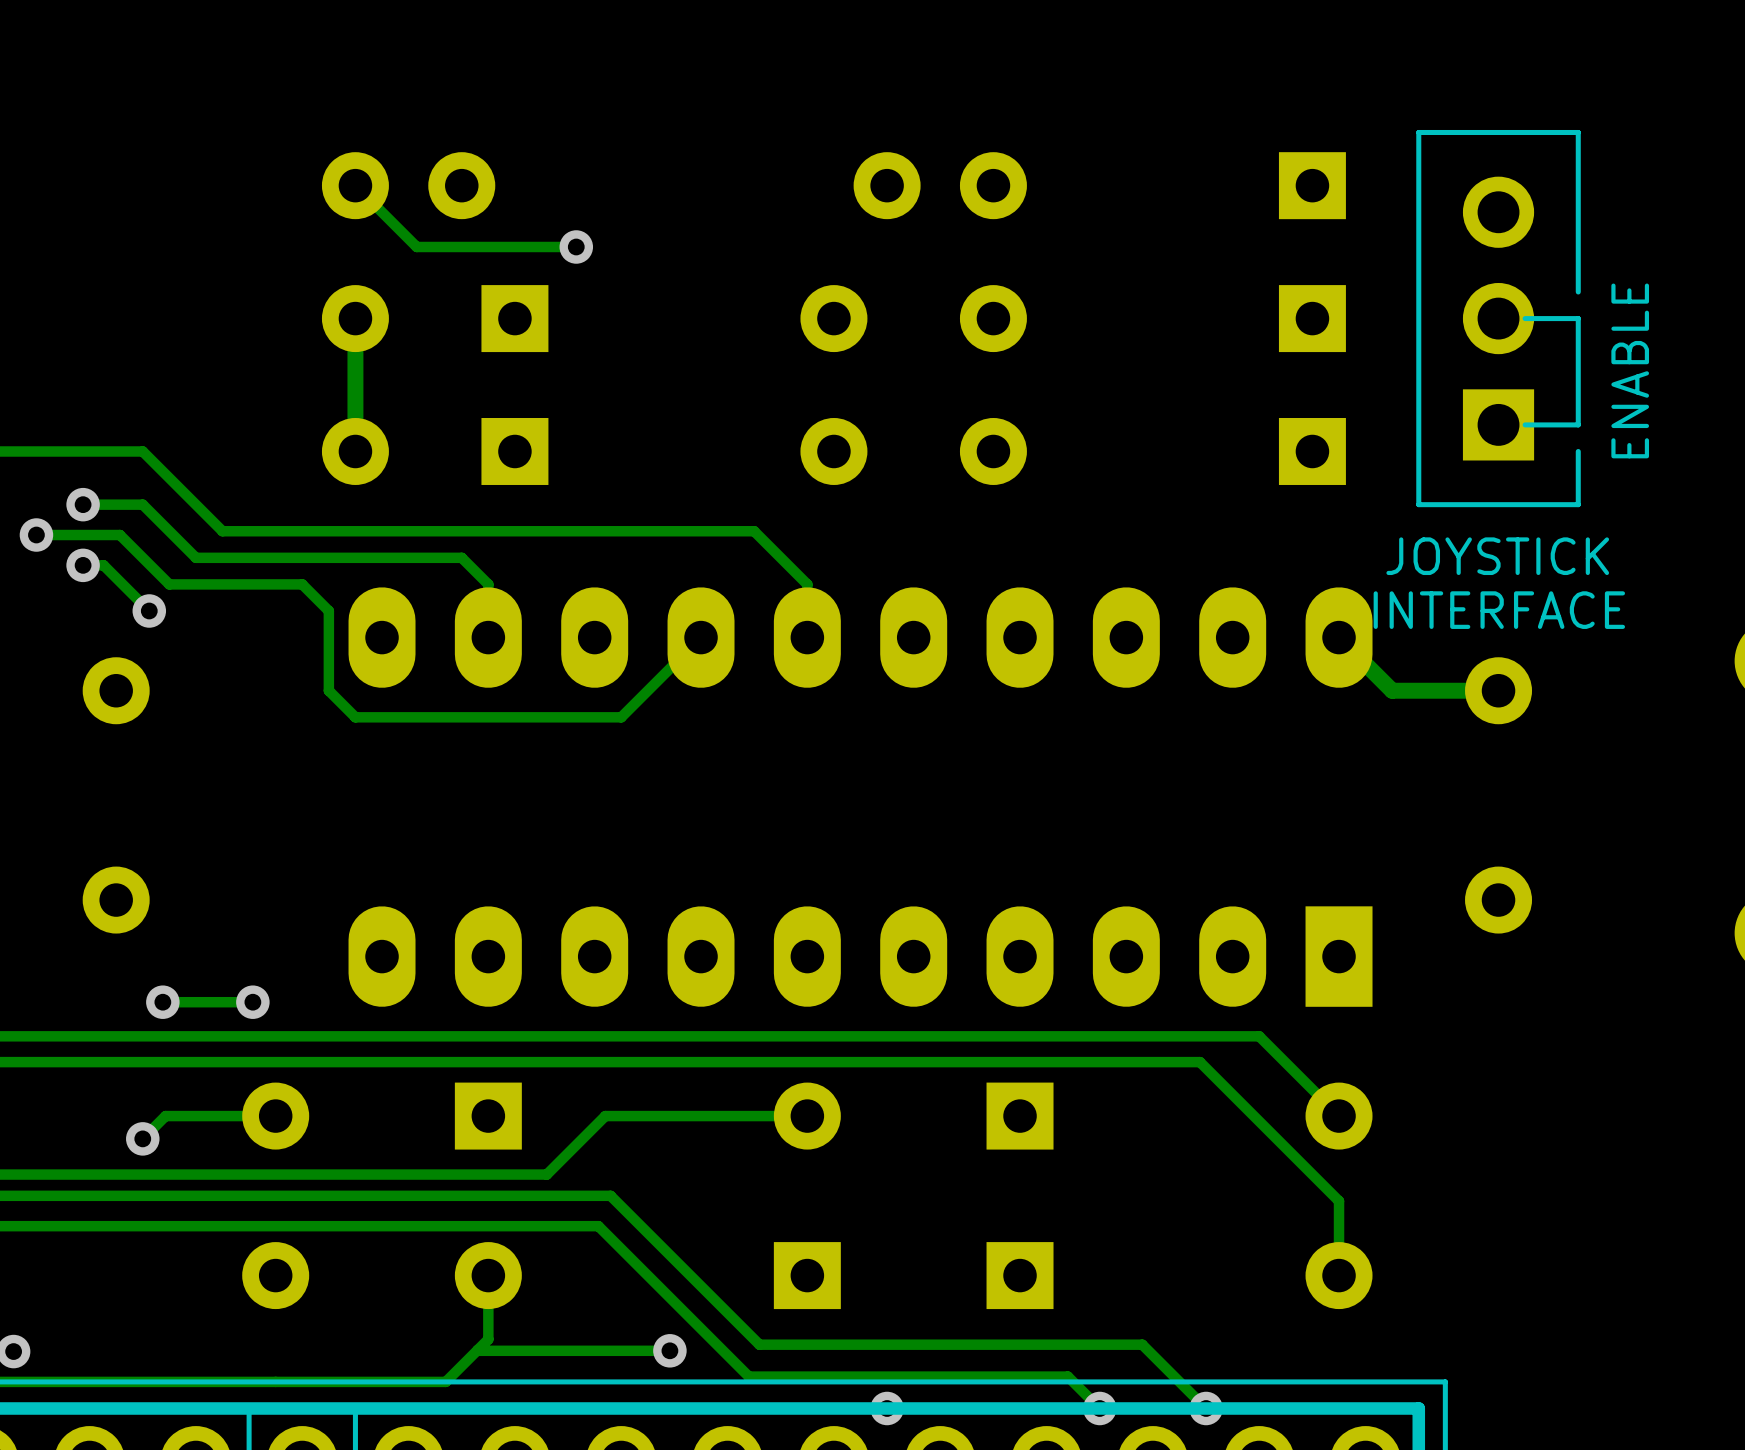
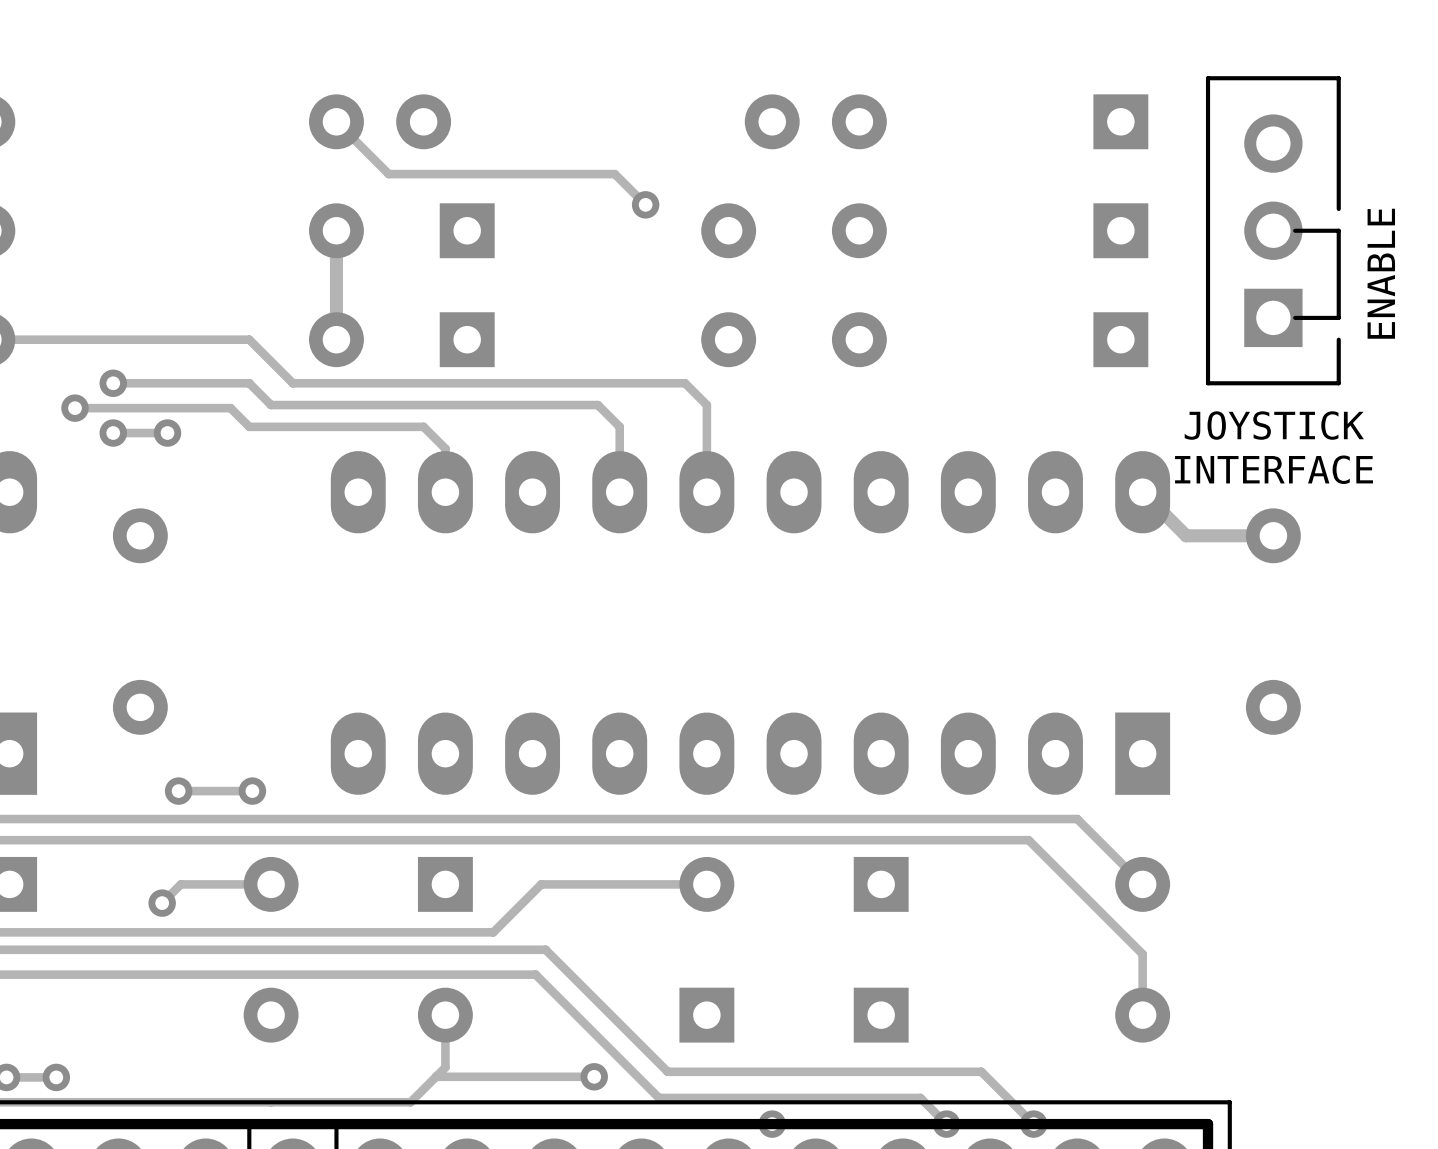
track: (576, 246) (416, 246) -> (645, 204) (614, 174) (388, 174) (386, 172)
via position: (576, 246) -> (645, 204)
track: (142, 451) (222, 531) (275, 531) -> (162, 339) (249, 339) (292, 383) (685, 383) (706, 405) (706, 448)
track: (142, 504) (195, 557) (249, 557) -> (162, 383) (249, 383) (271, 405)
track: (674, 531) (754, 531) (807, 584) -> (597, 405) (619, 426) (619, 492)
track: (119, 535) (169, 584) (302, 584) (328, 610) (328, 690) (355, 717) (621, 717) (701, 637) -> (143, 408) (230, 408) (249, 426)
track: (103, 565) (149, 610) -> (130, 433) (167, 433)
via position: (149, 610) -> (167, 433)

